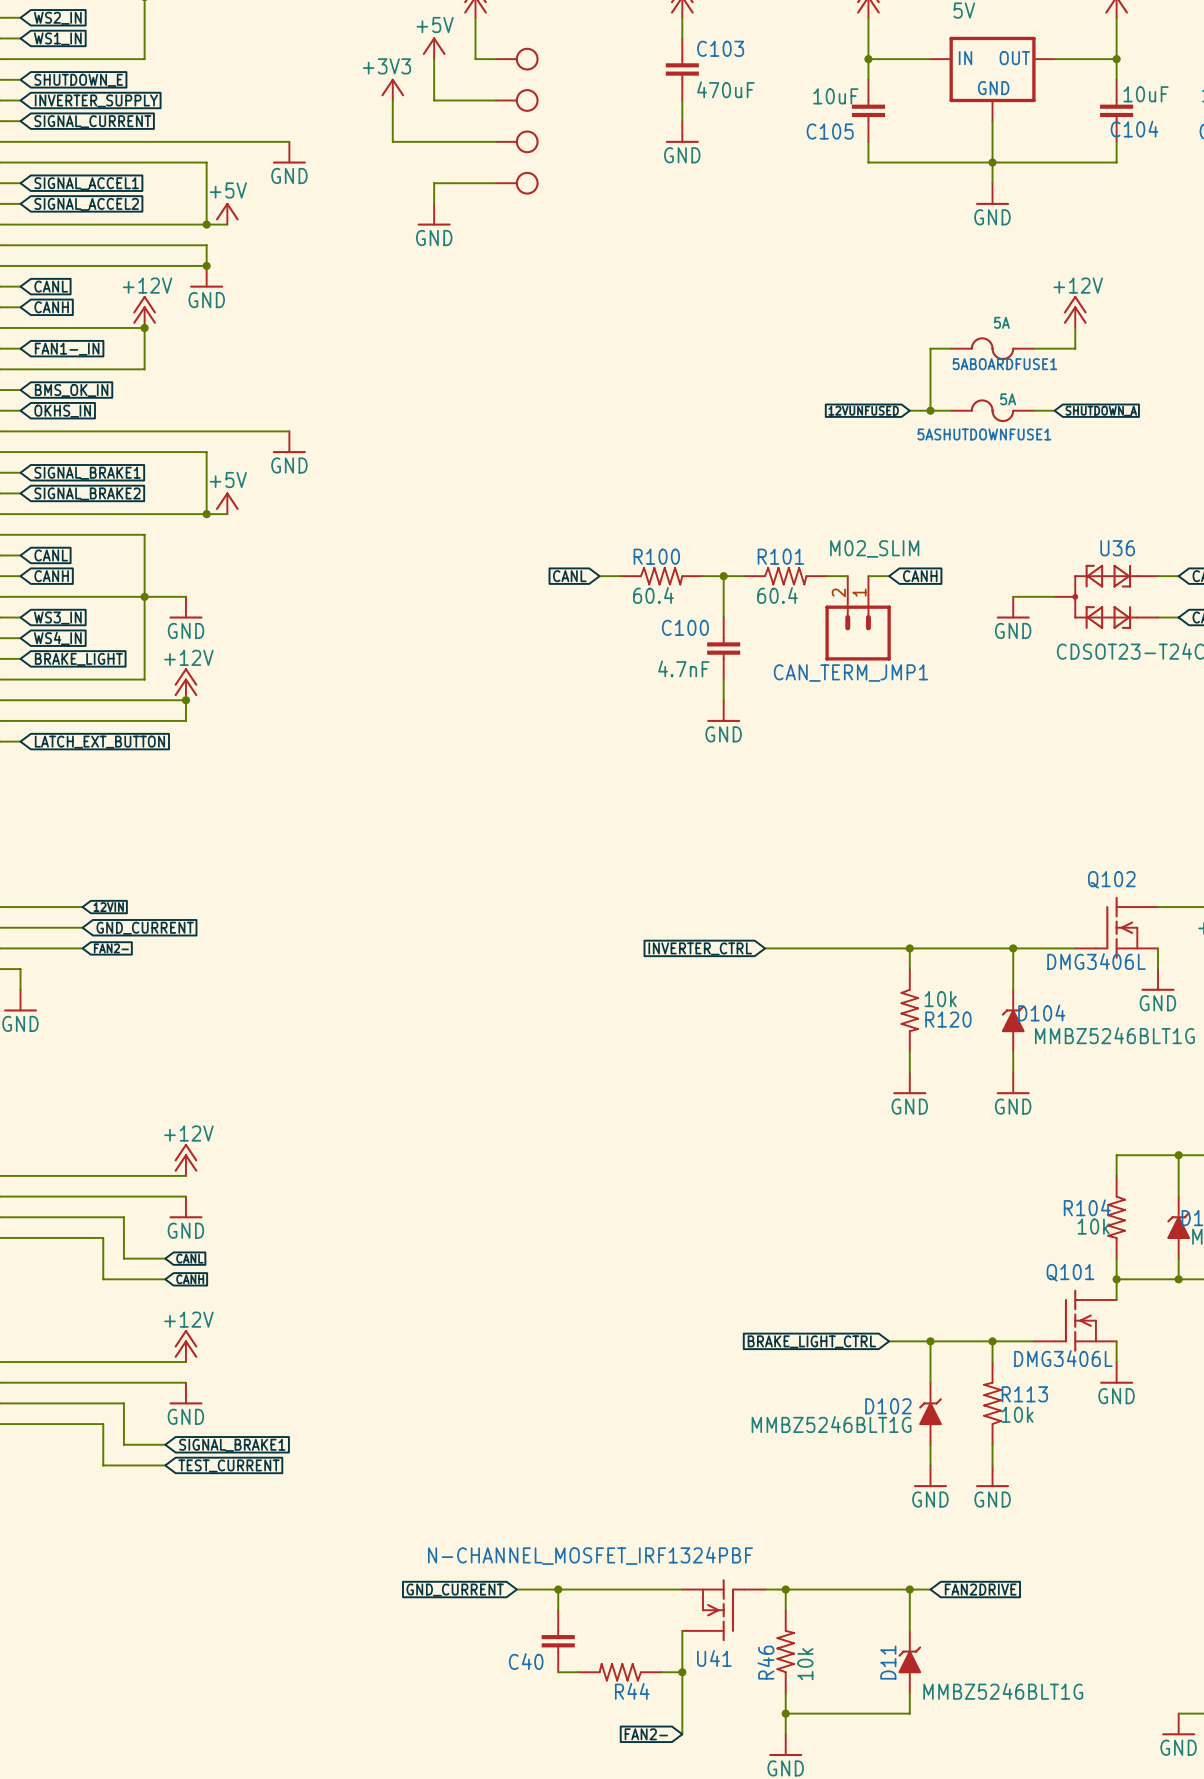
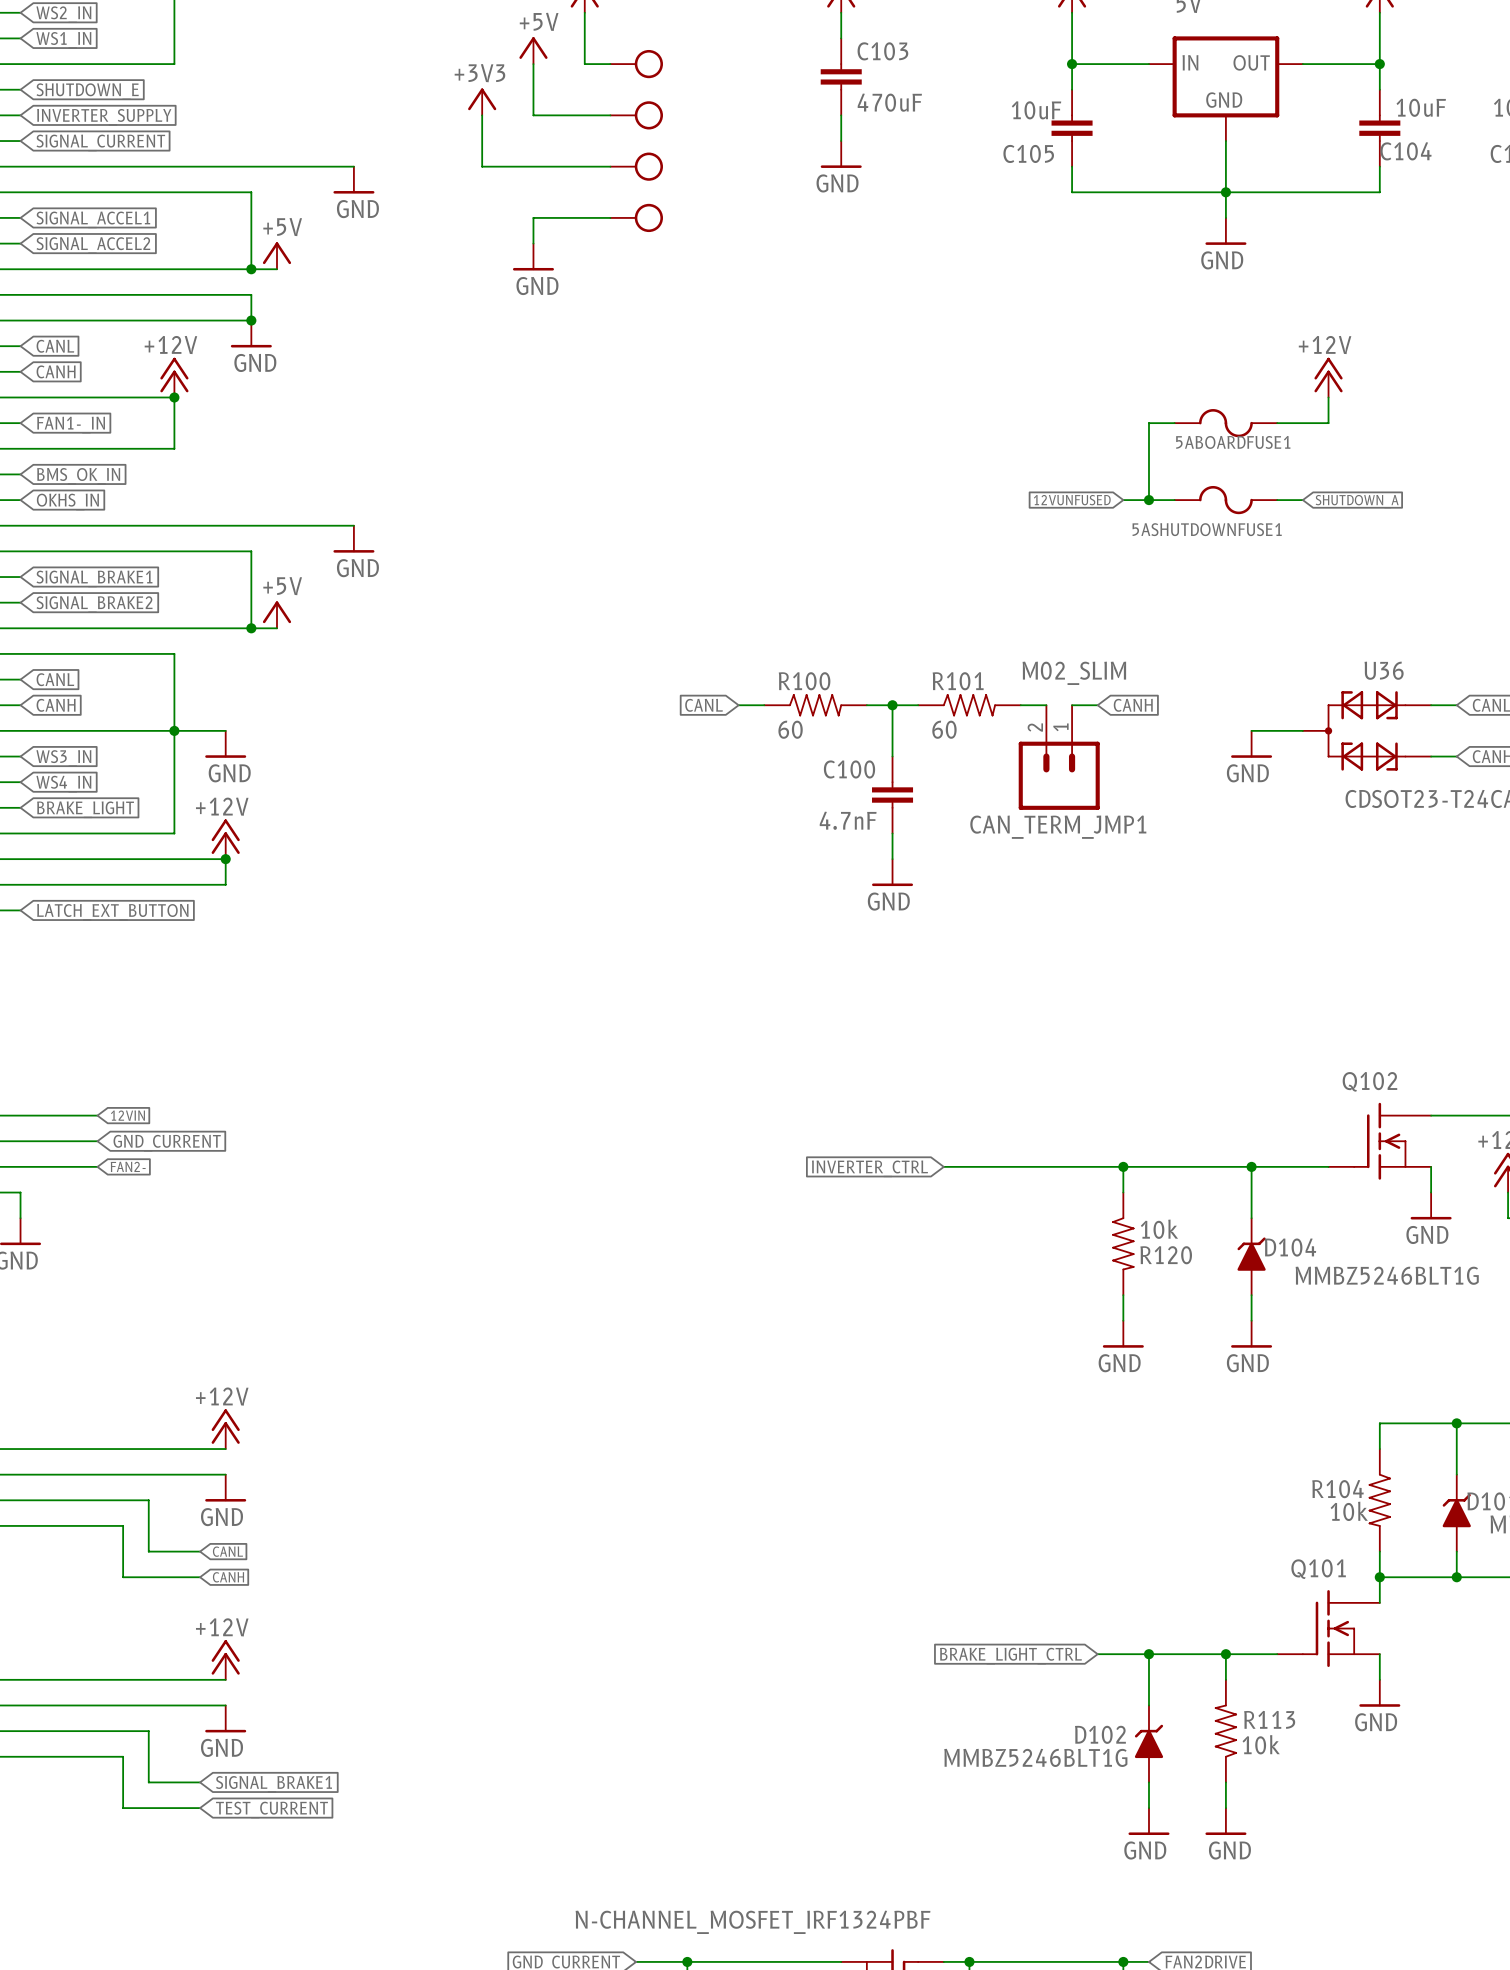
5ABOARDFUSE1 value: 5A (1001, 322) -> none
5ASHUTDOWNFUSE1 value: 5A (1008, 399) -> none
R100 value: 60.4 (653, 595) -> 60 (790, 729)
R101 value: 60.4 (777, 595) -> 60 (944, 729)
Q102 value: DMG3406L (1096, 961) -> none
Q101 value: DMG3406L (1063, 1358) -> none

